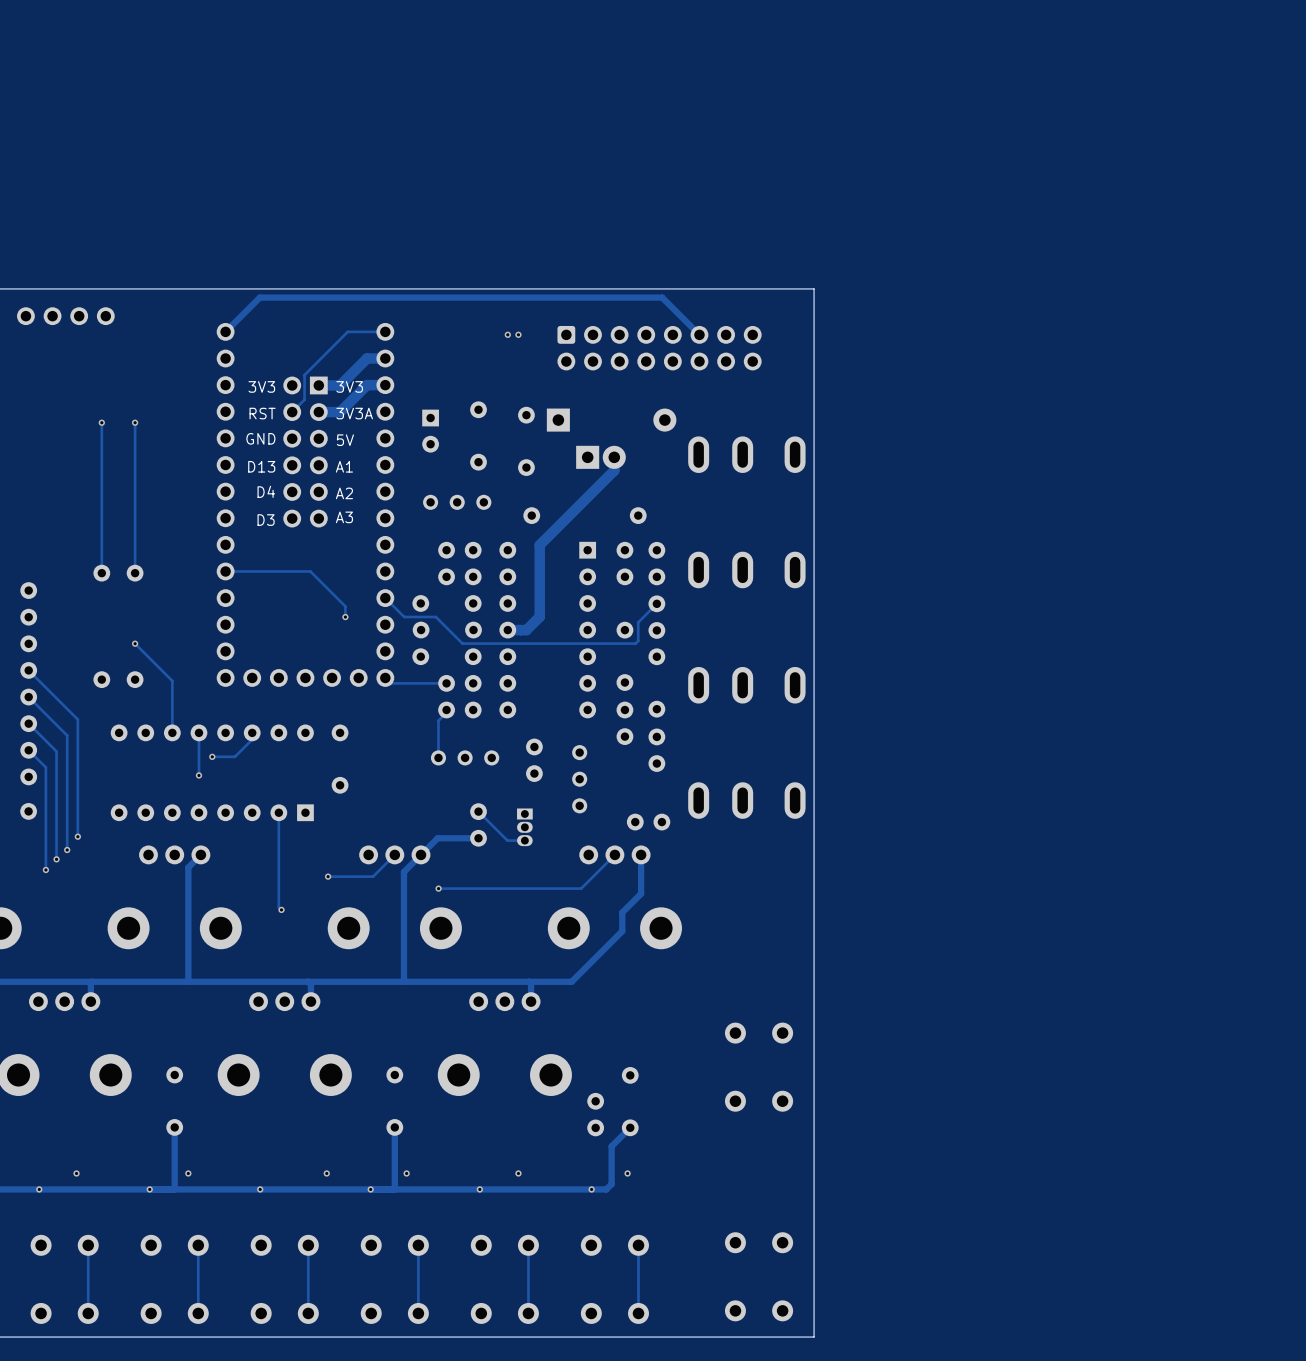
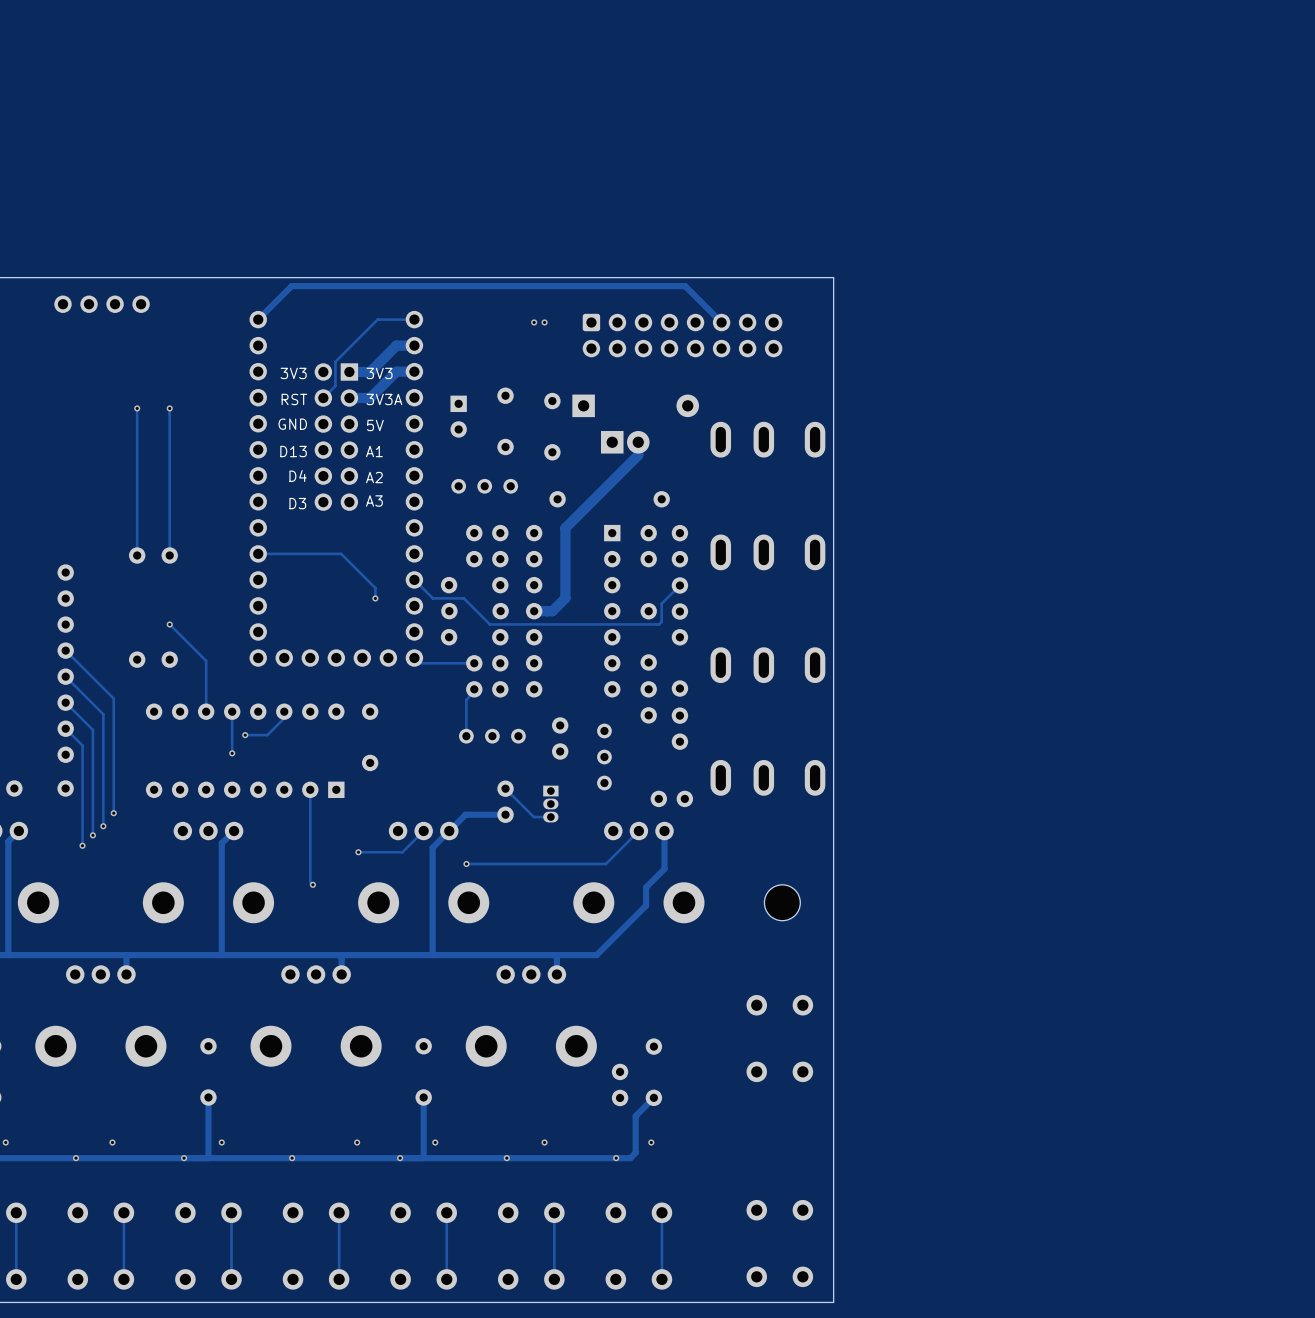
part: none -> (782, 902)

